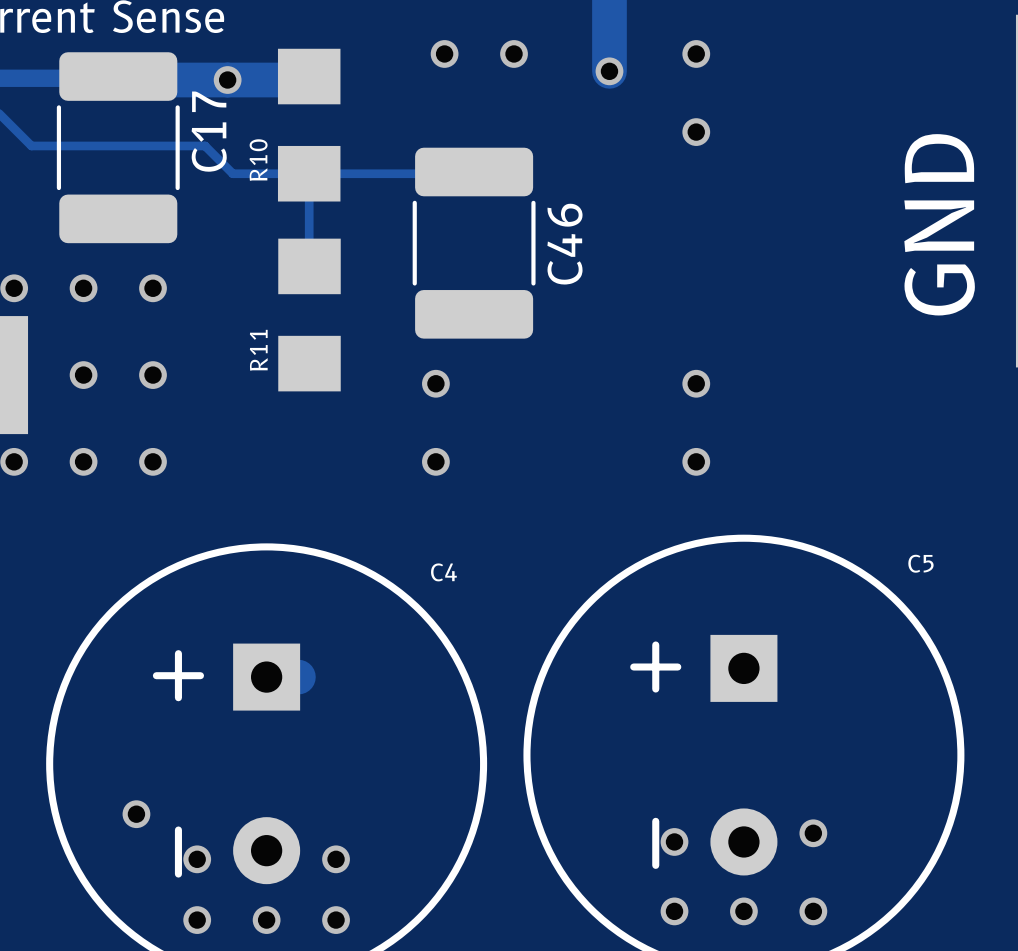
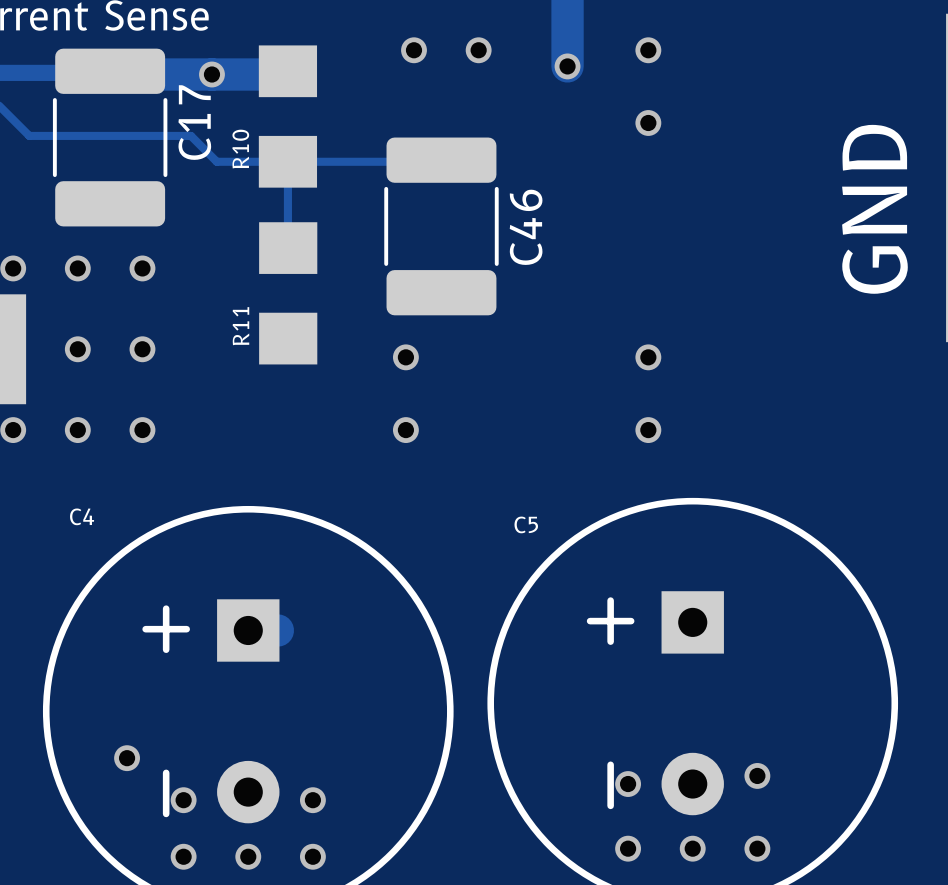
C5 name position: C5 (920, 563) -> C5 (526, 524)
C4 name position: C4 (443, 572) -> C4 (82, 516)

